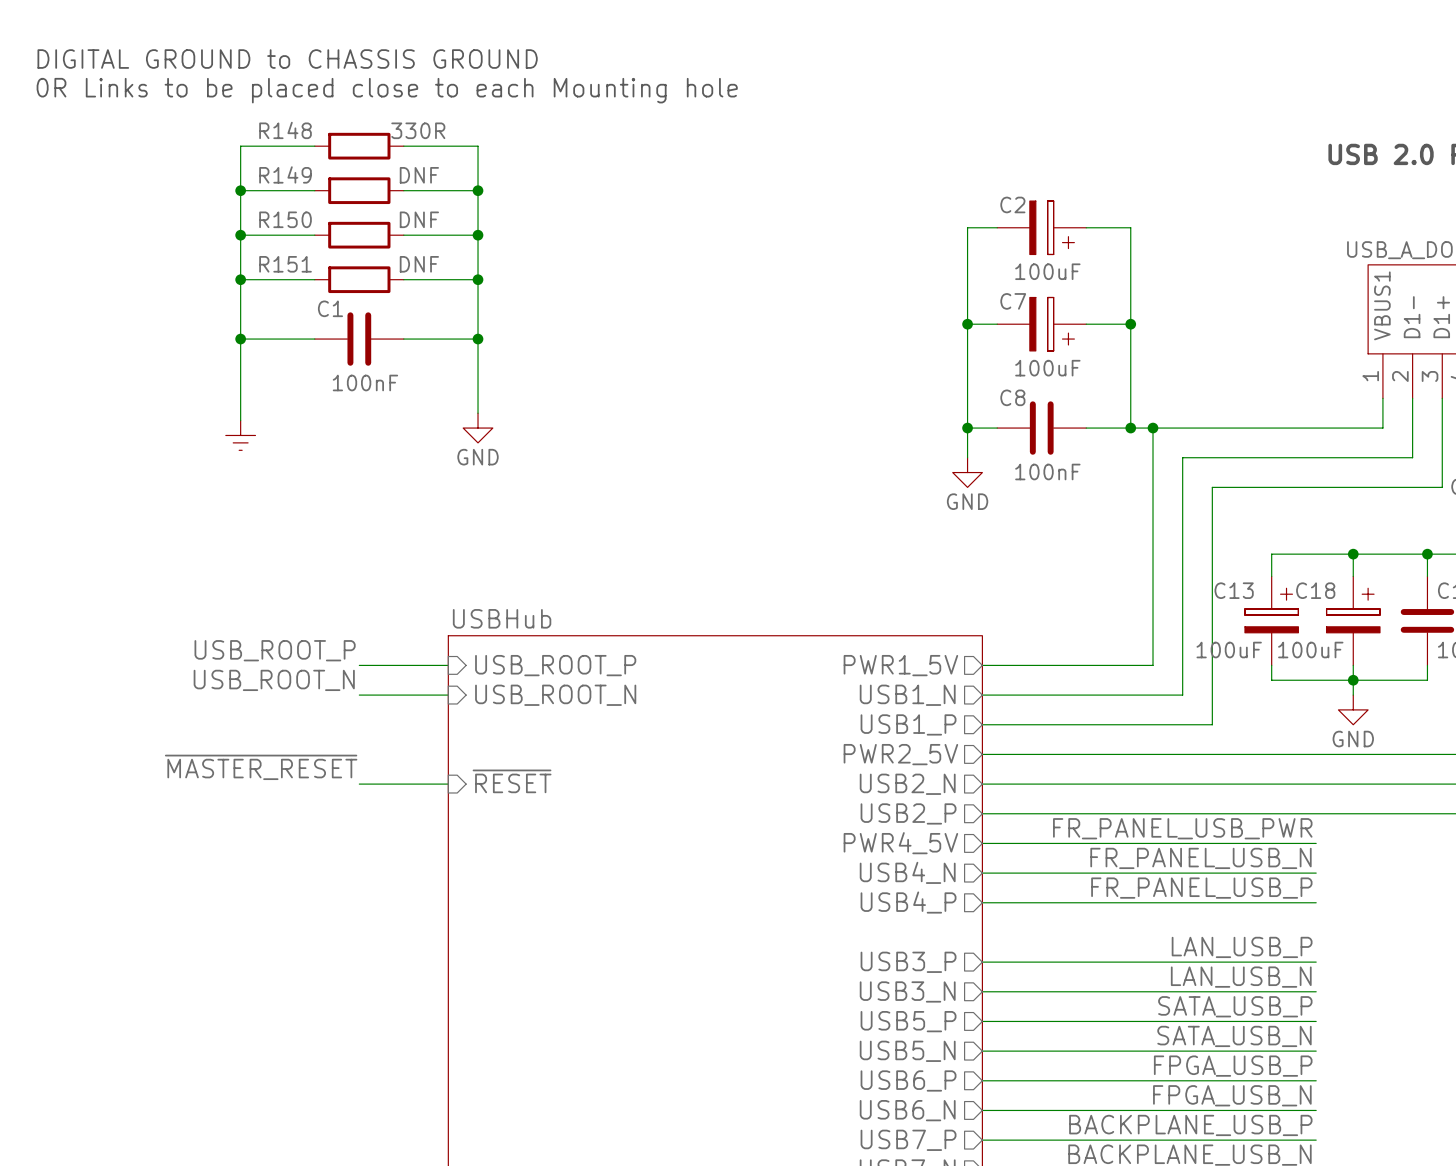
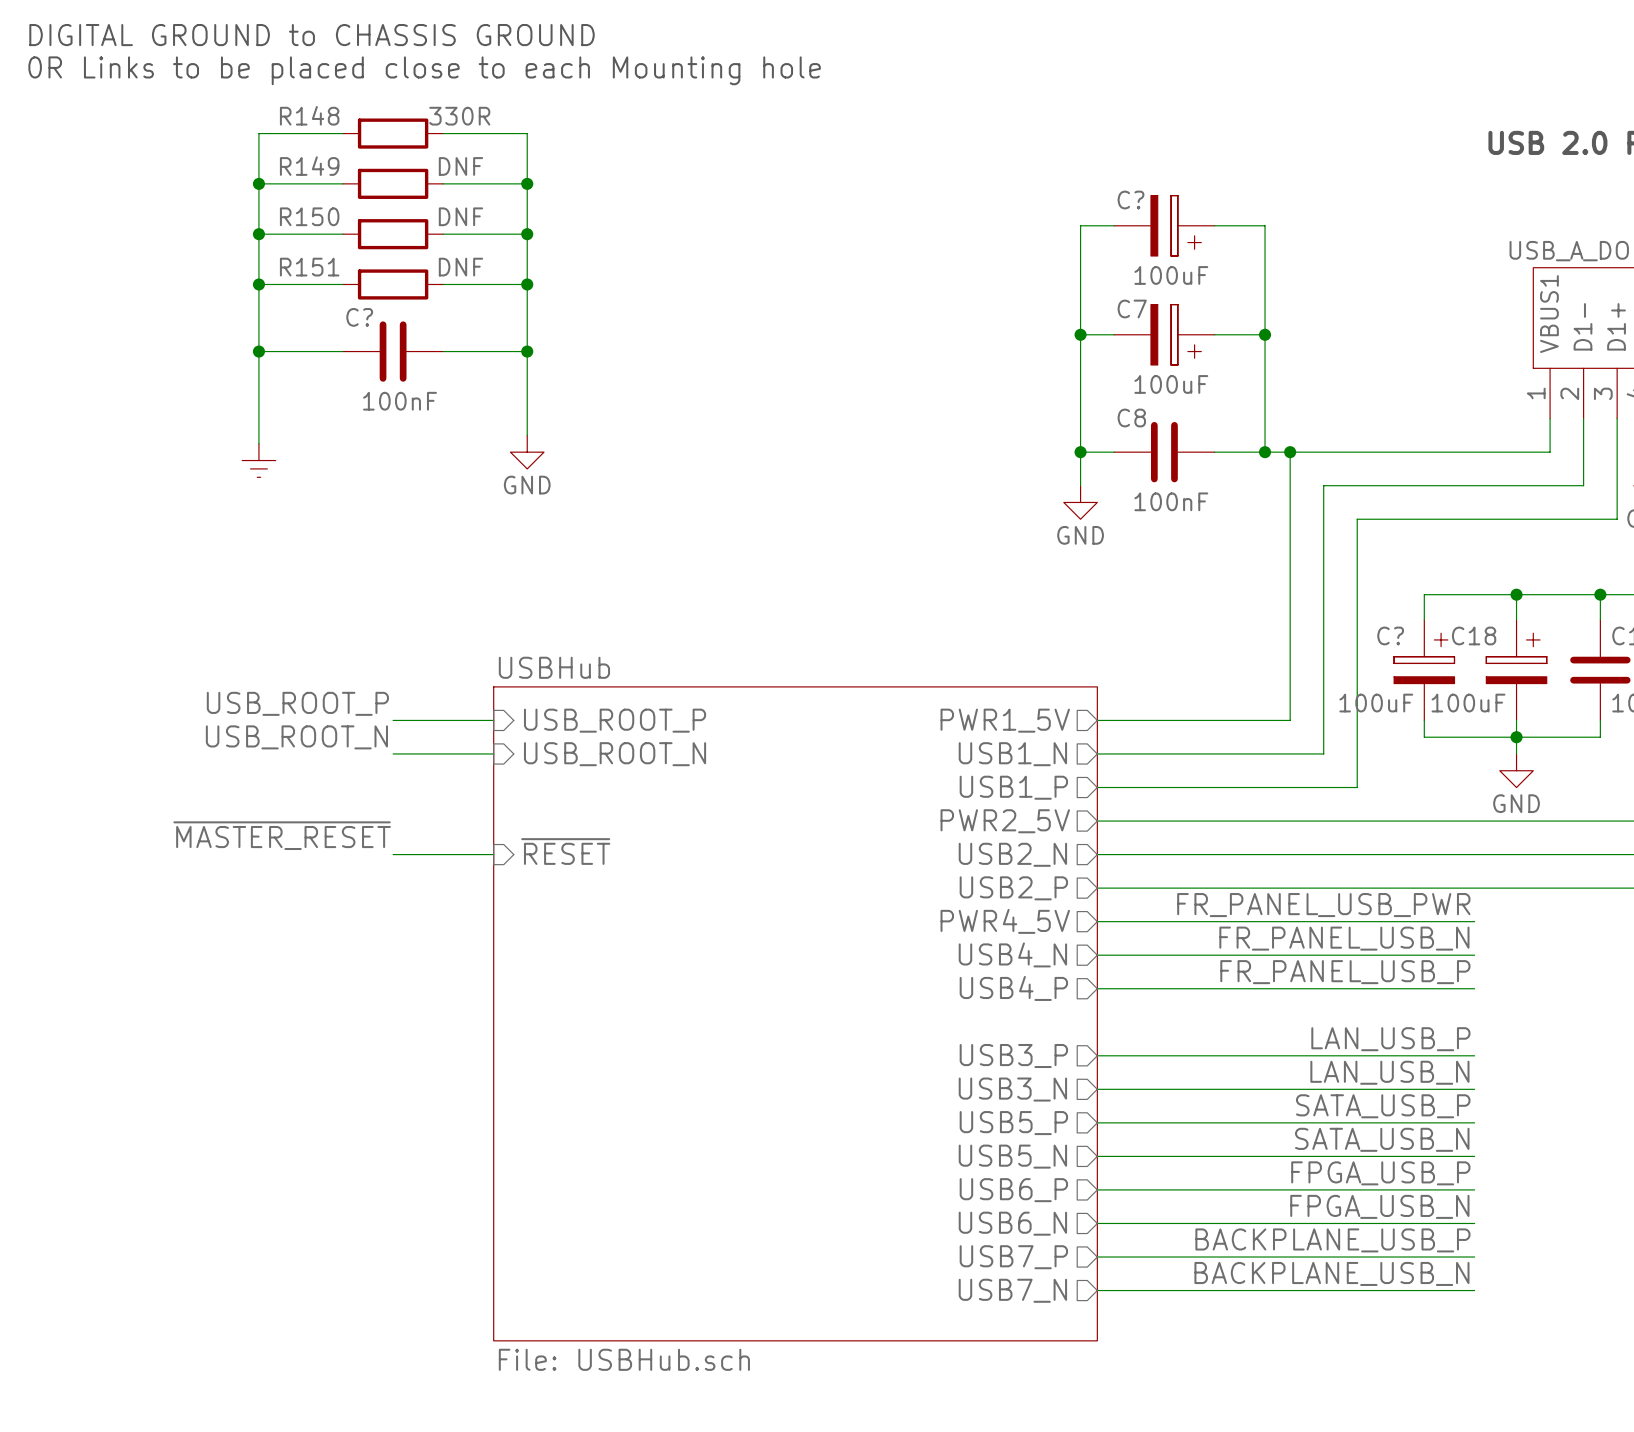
C2 name: C2 (1012, 204) -> C? (1131, 200)
C1 name: C1 (330, 308) -> C? (359, 317)
C13 name: C13 (1234, 590) -> C? (1390, 635)

